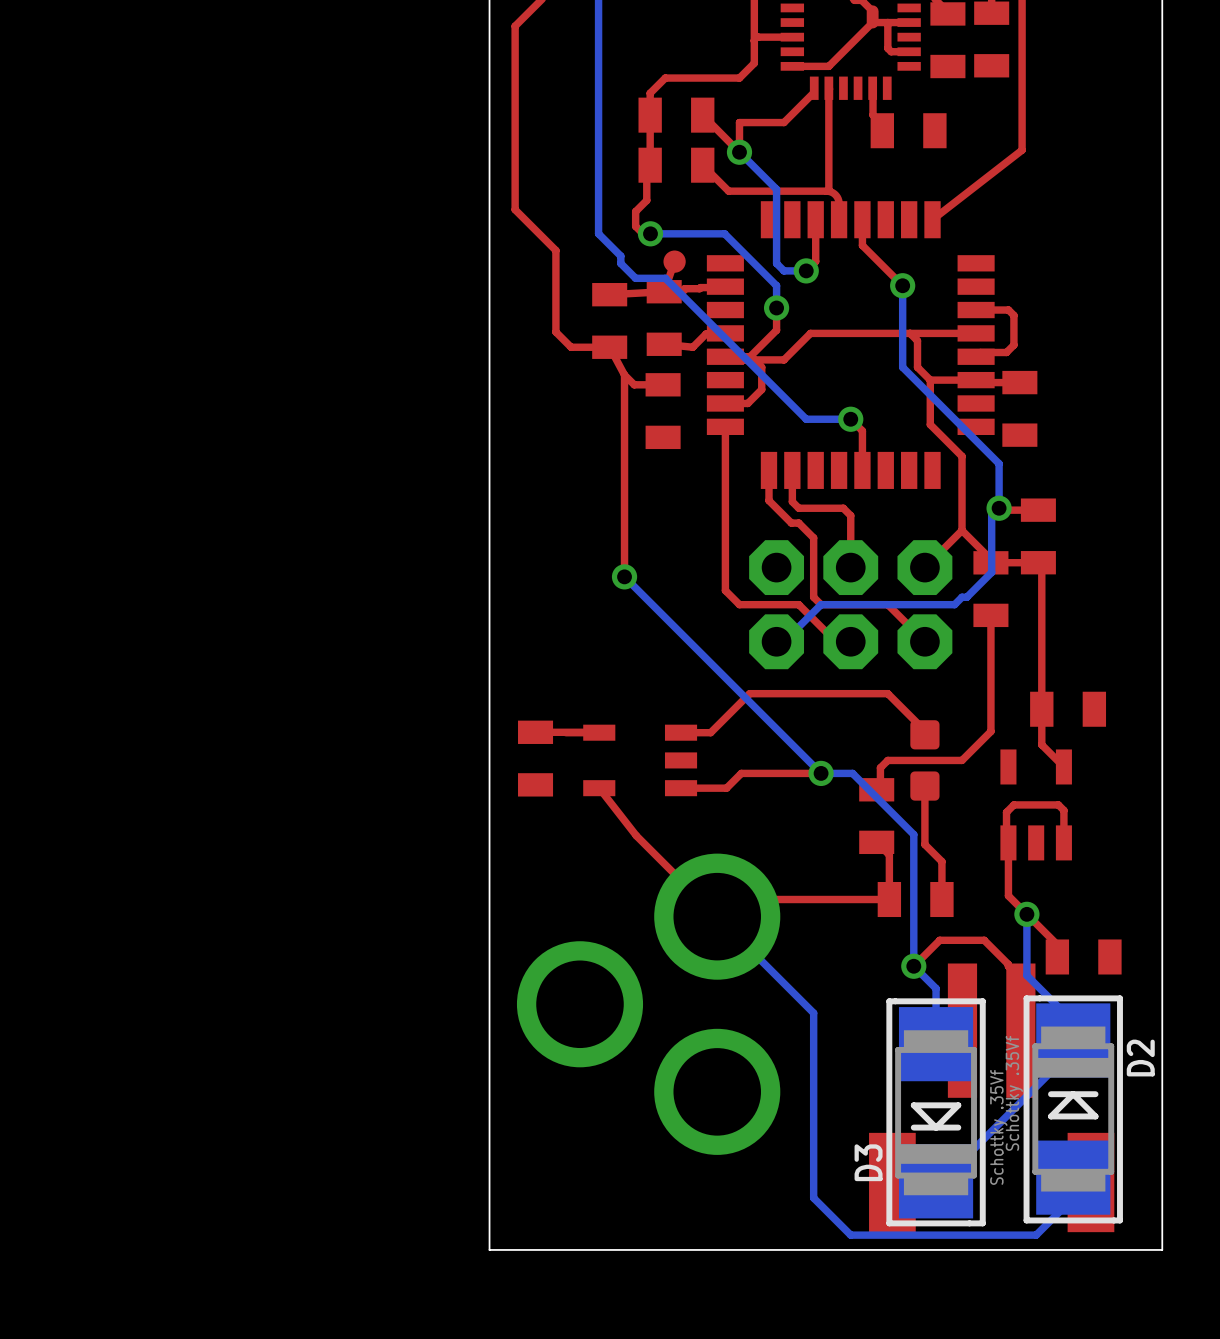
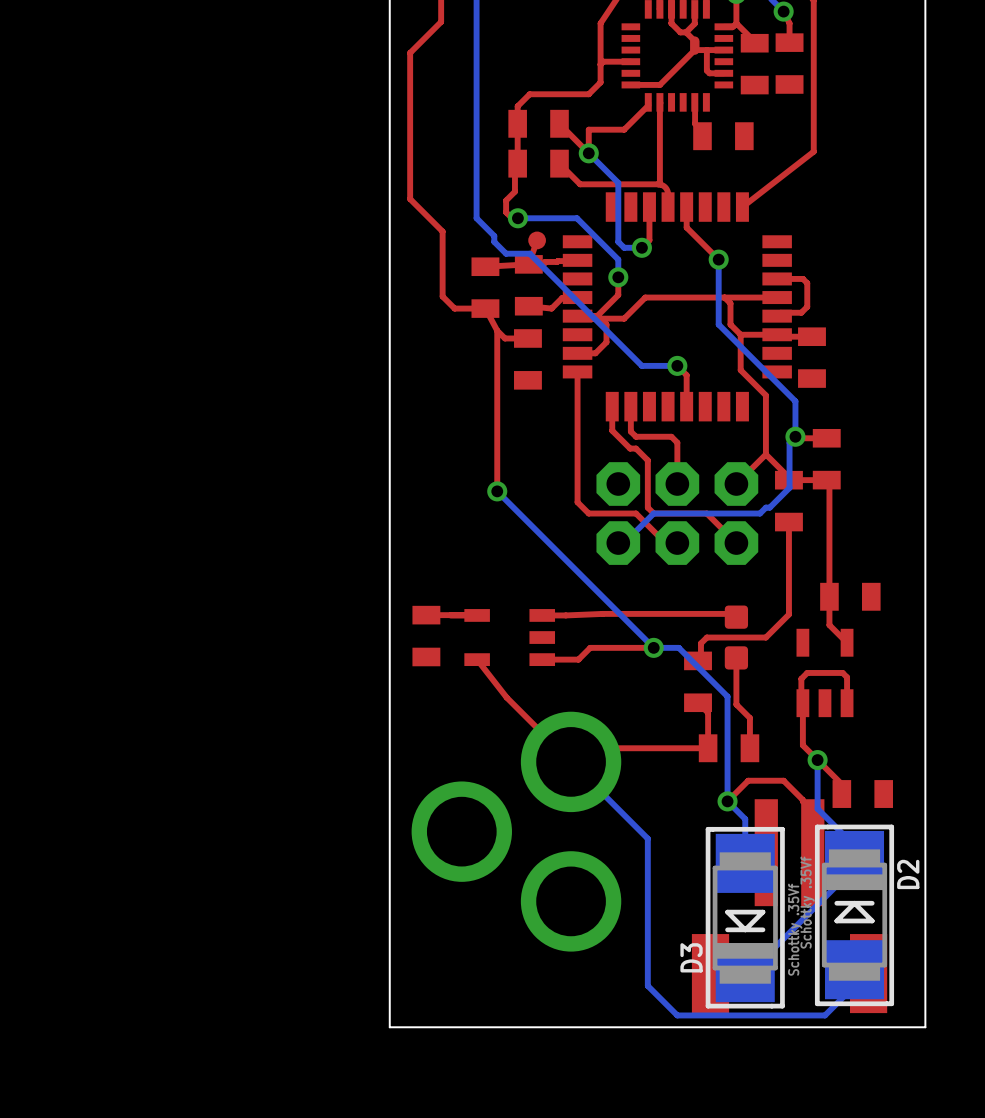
top track: (924, 730) (887, 693) (749, 693) (710, 732) -> (736, 613) (565, 615)

